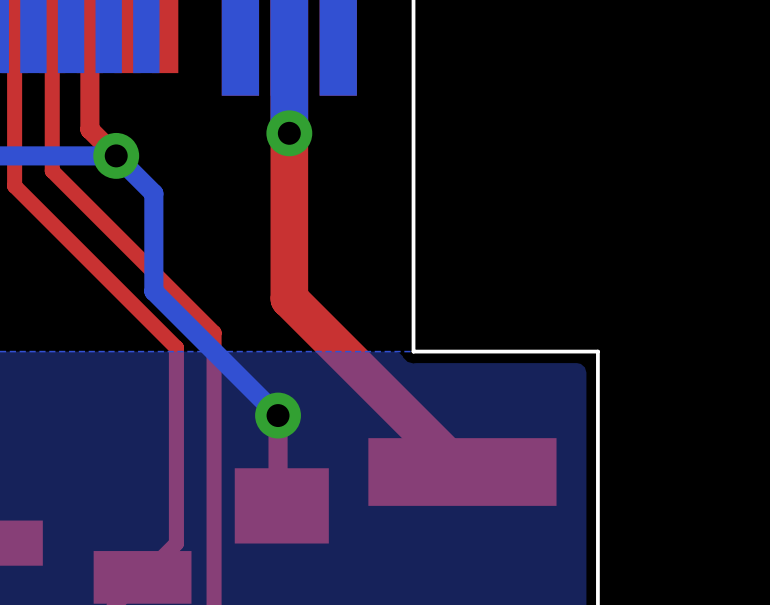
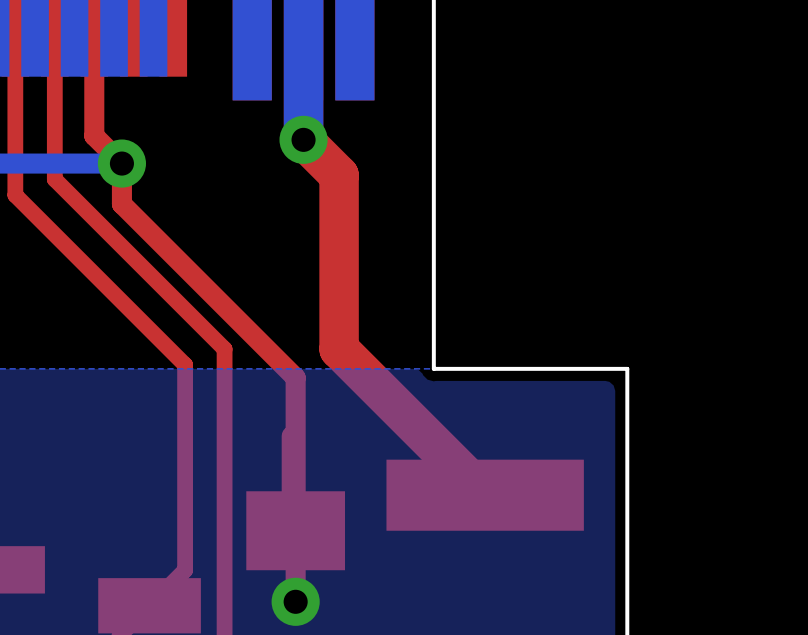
top track: (289, 133) (289, 298) (323, 332) -> (303, 139) (339, 175) (339, 349)
top track: none -> (121, 163) (121, 204) (295, 377) (295, 601)
bottom track: (116, 155) (153, 193) (153, 291) (278, 415) -> none
via position: (278, 415) -> (295, 601)

